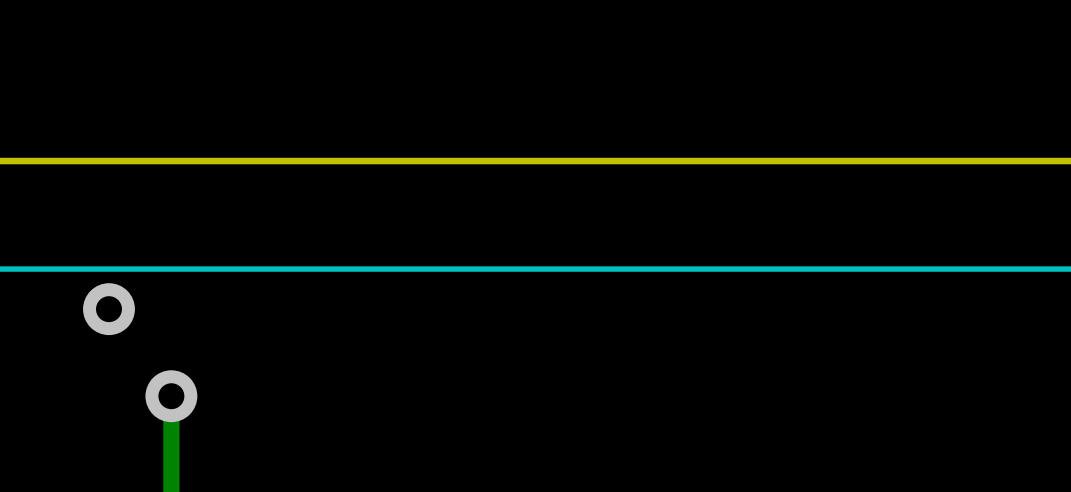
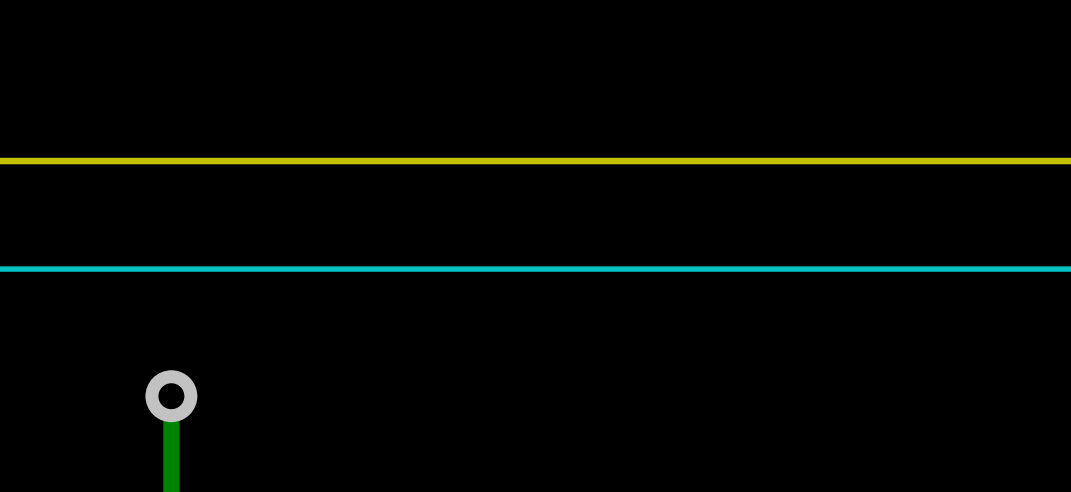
via: (108, 309) -> none

